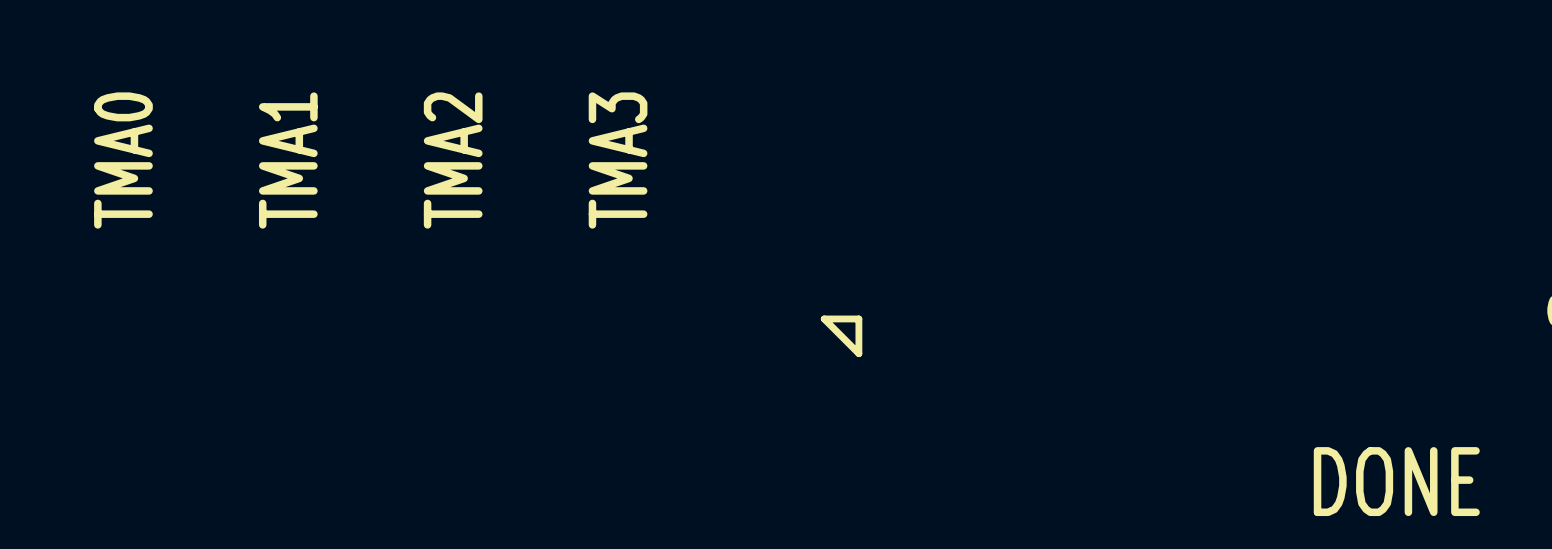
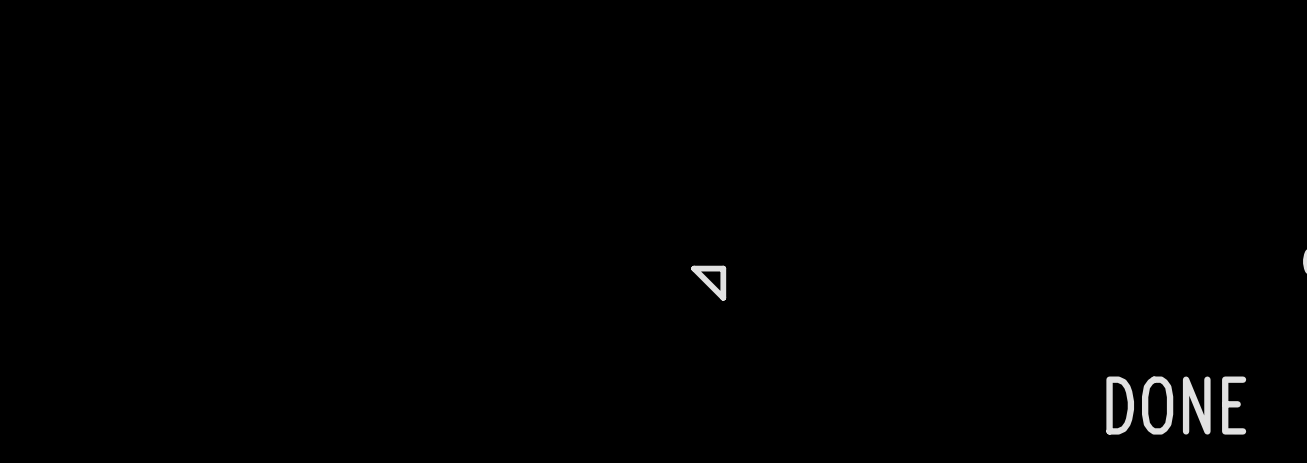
text: TMA0 (123, 160) -> none
text: TMA1 (288, 160) -> none
text: TMA2 (453, 160) -> none
text: TMA3 (618, 160) -> none

